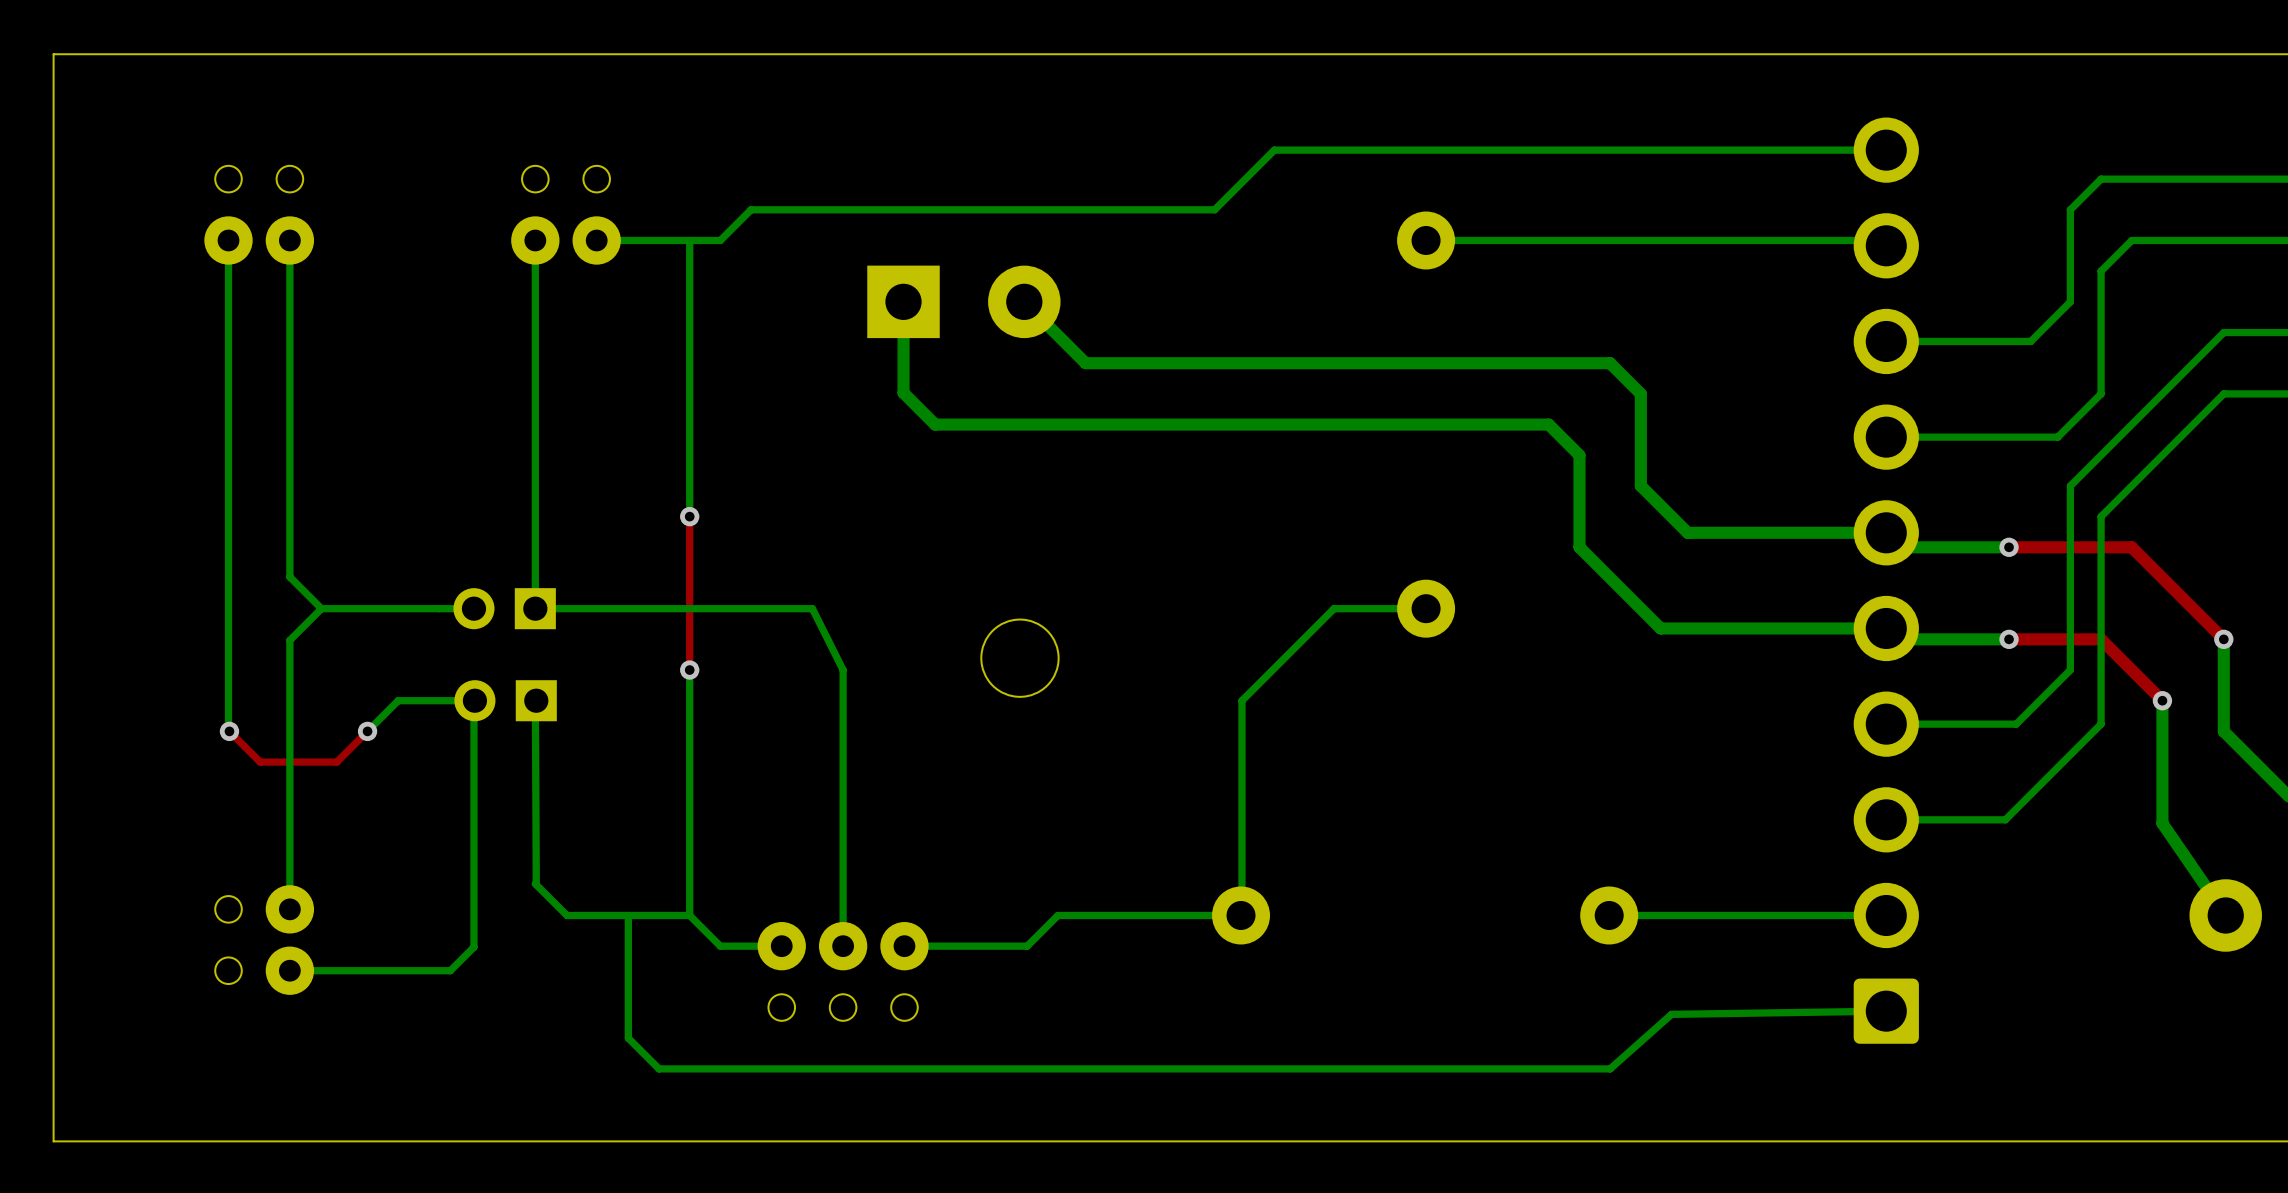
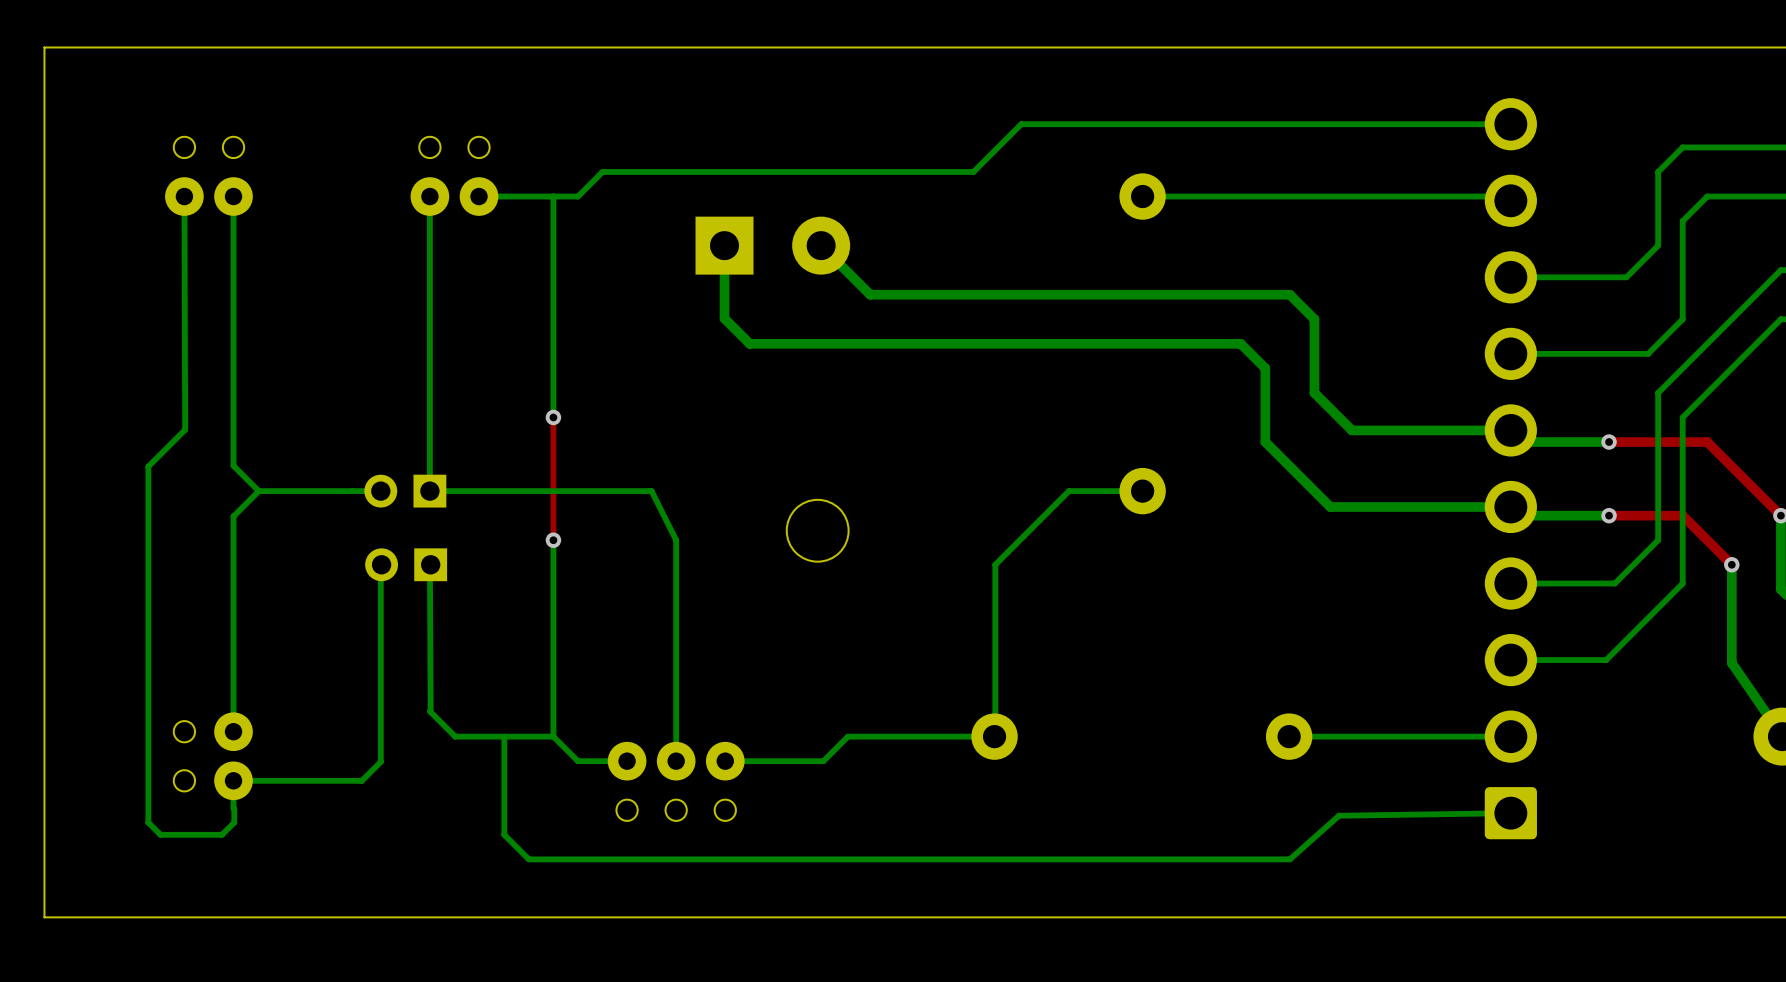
bottom track: (228, 240) (229, 731) -> (184, 196) (185, 429) (148, 466) (148, 822) (160, 834) (222, 834) (234, 822) (233, 780)
bottom track: (474, 700) (398, 700) (367, 731) -> none
via: (229, 731) -> none
top track: (367, 731) (336, 762) (260, 762) (229, 731) -> none
via: (367, 731) -> none

